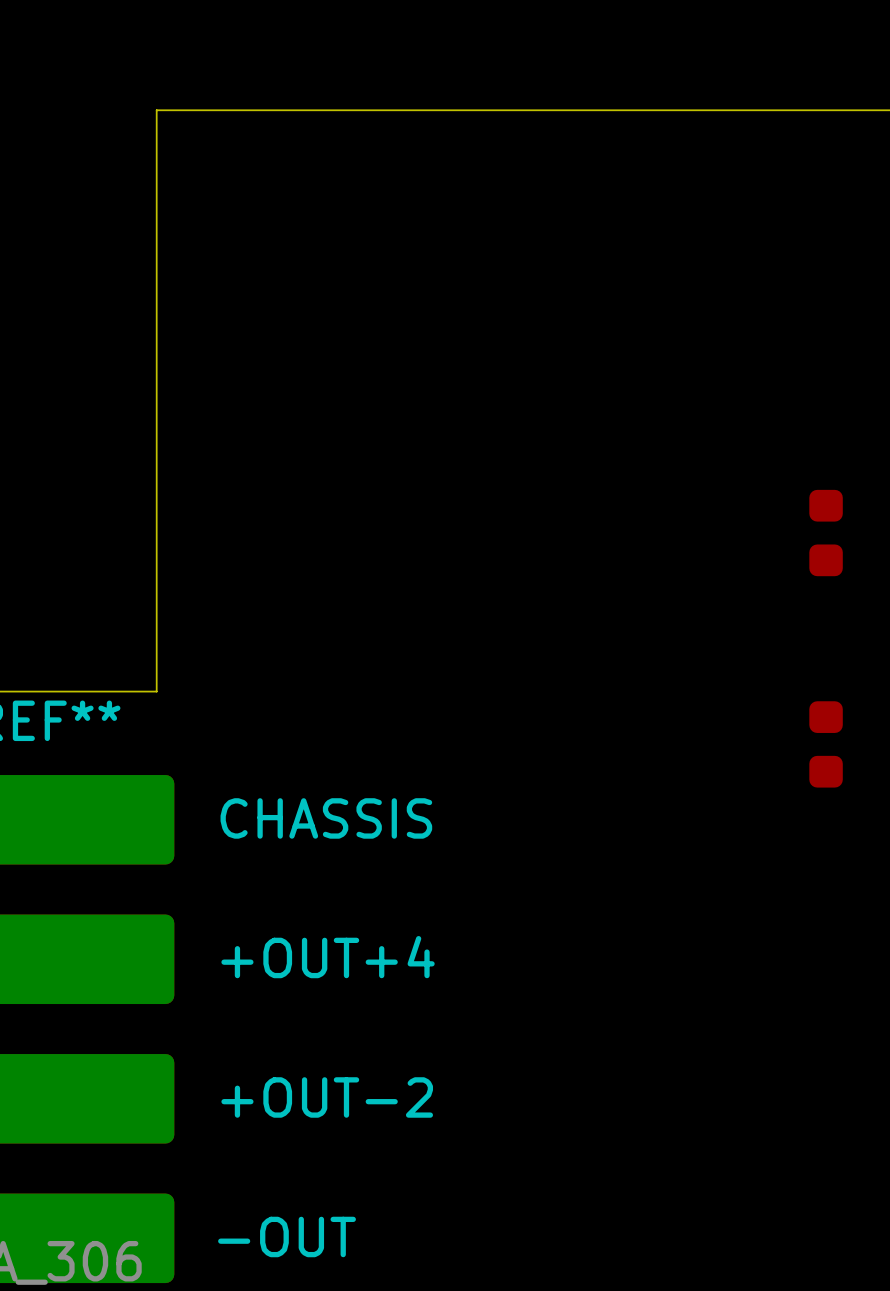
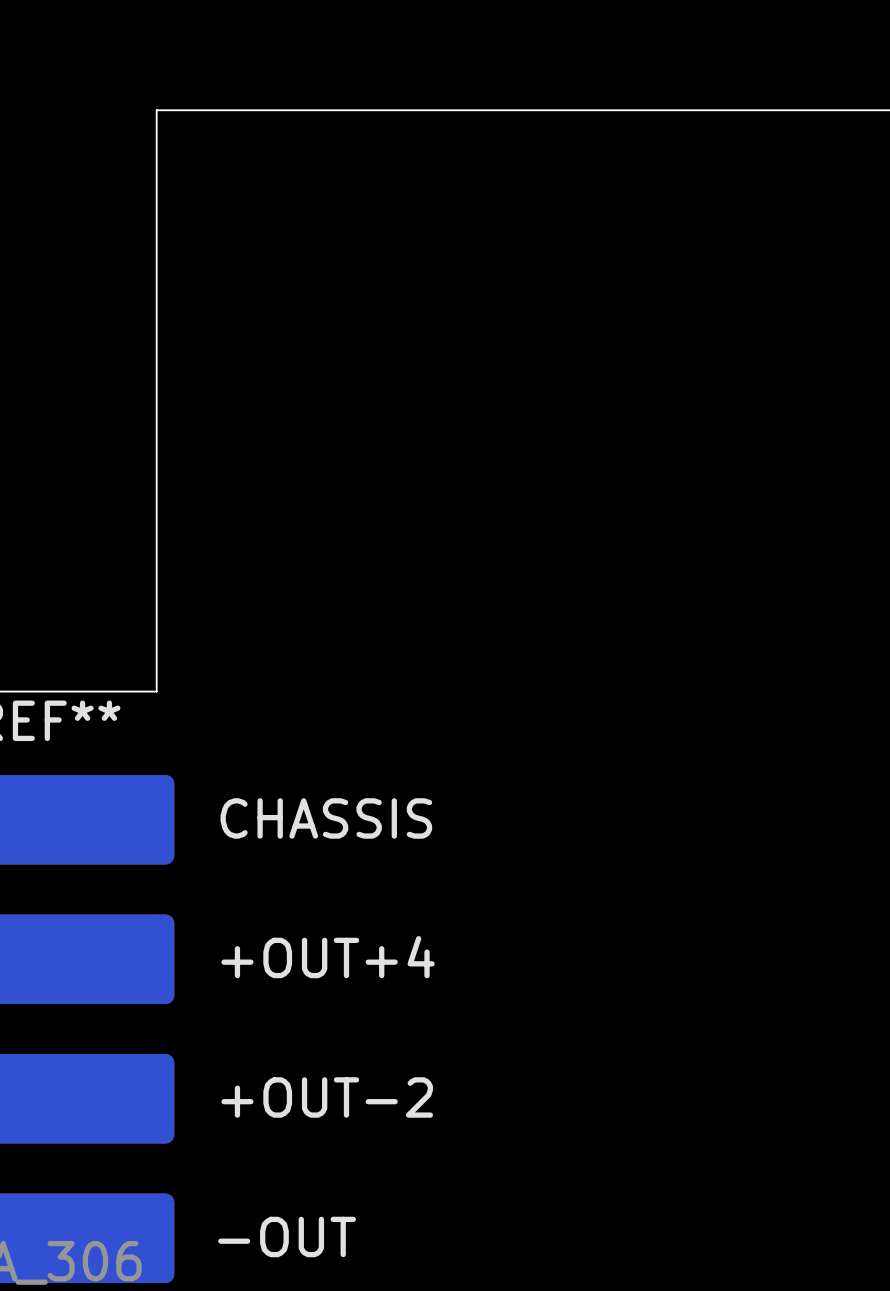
part: (826, 533) -> none
part: (826, 744) -> none

